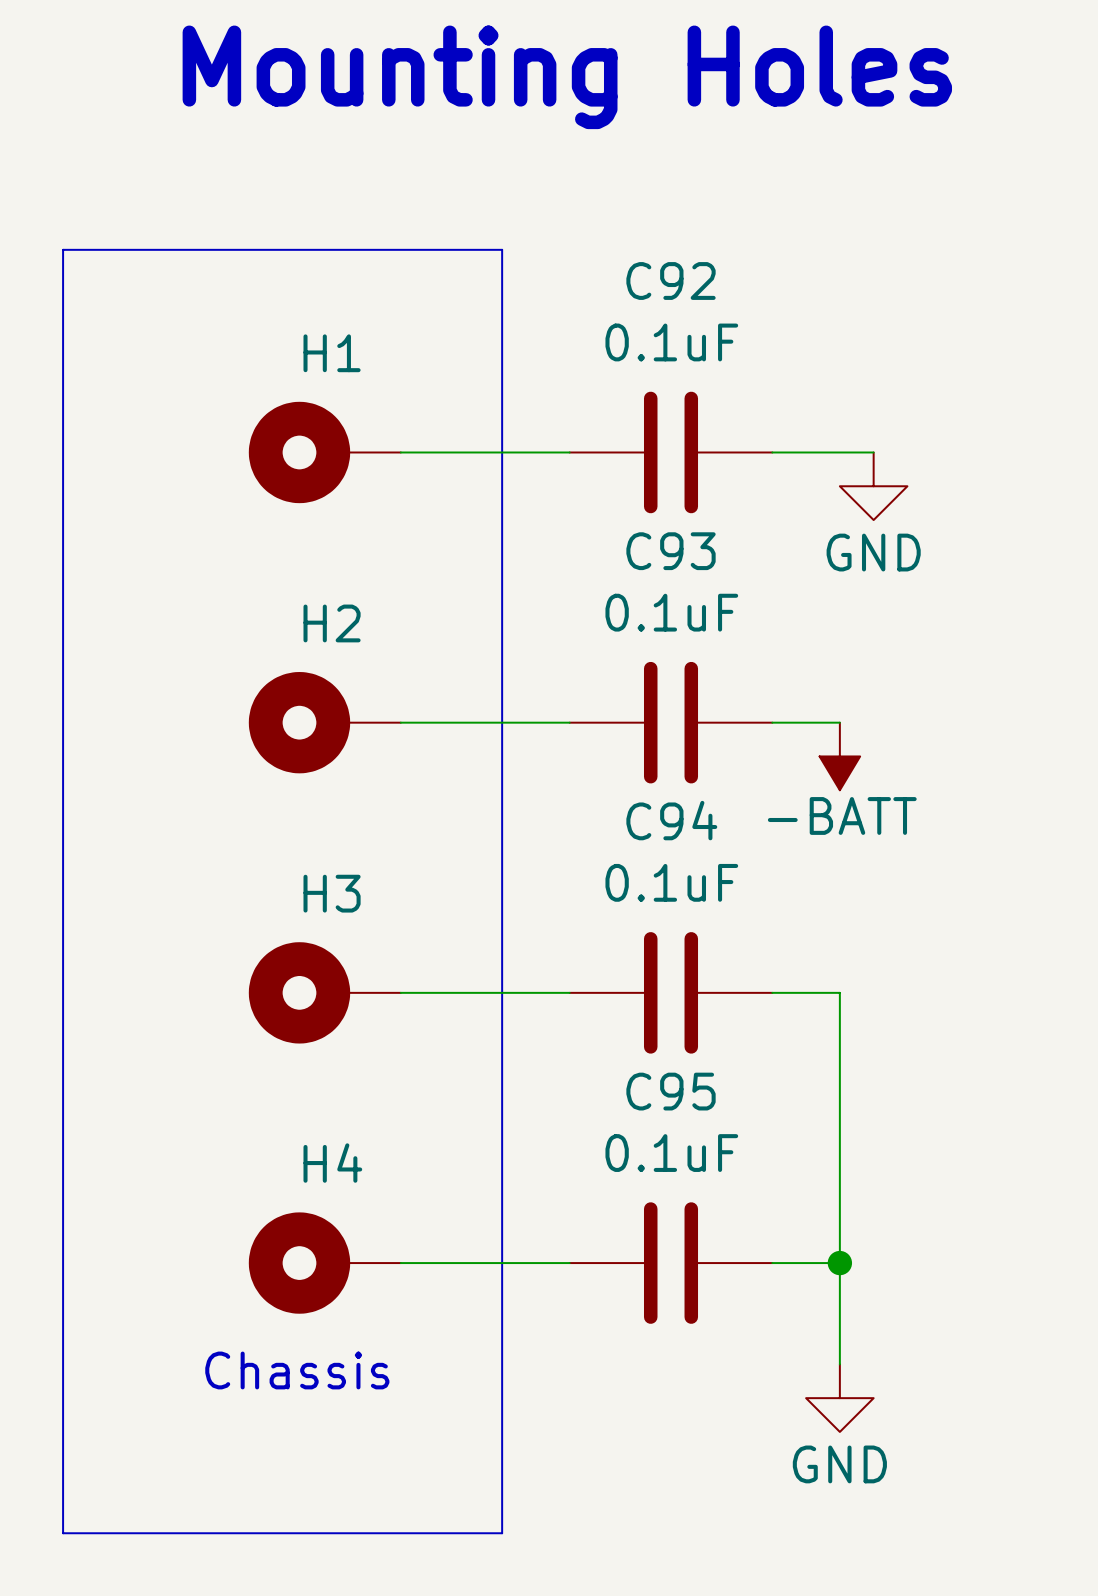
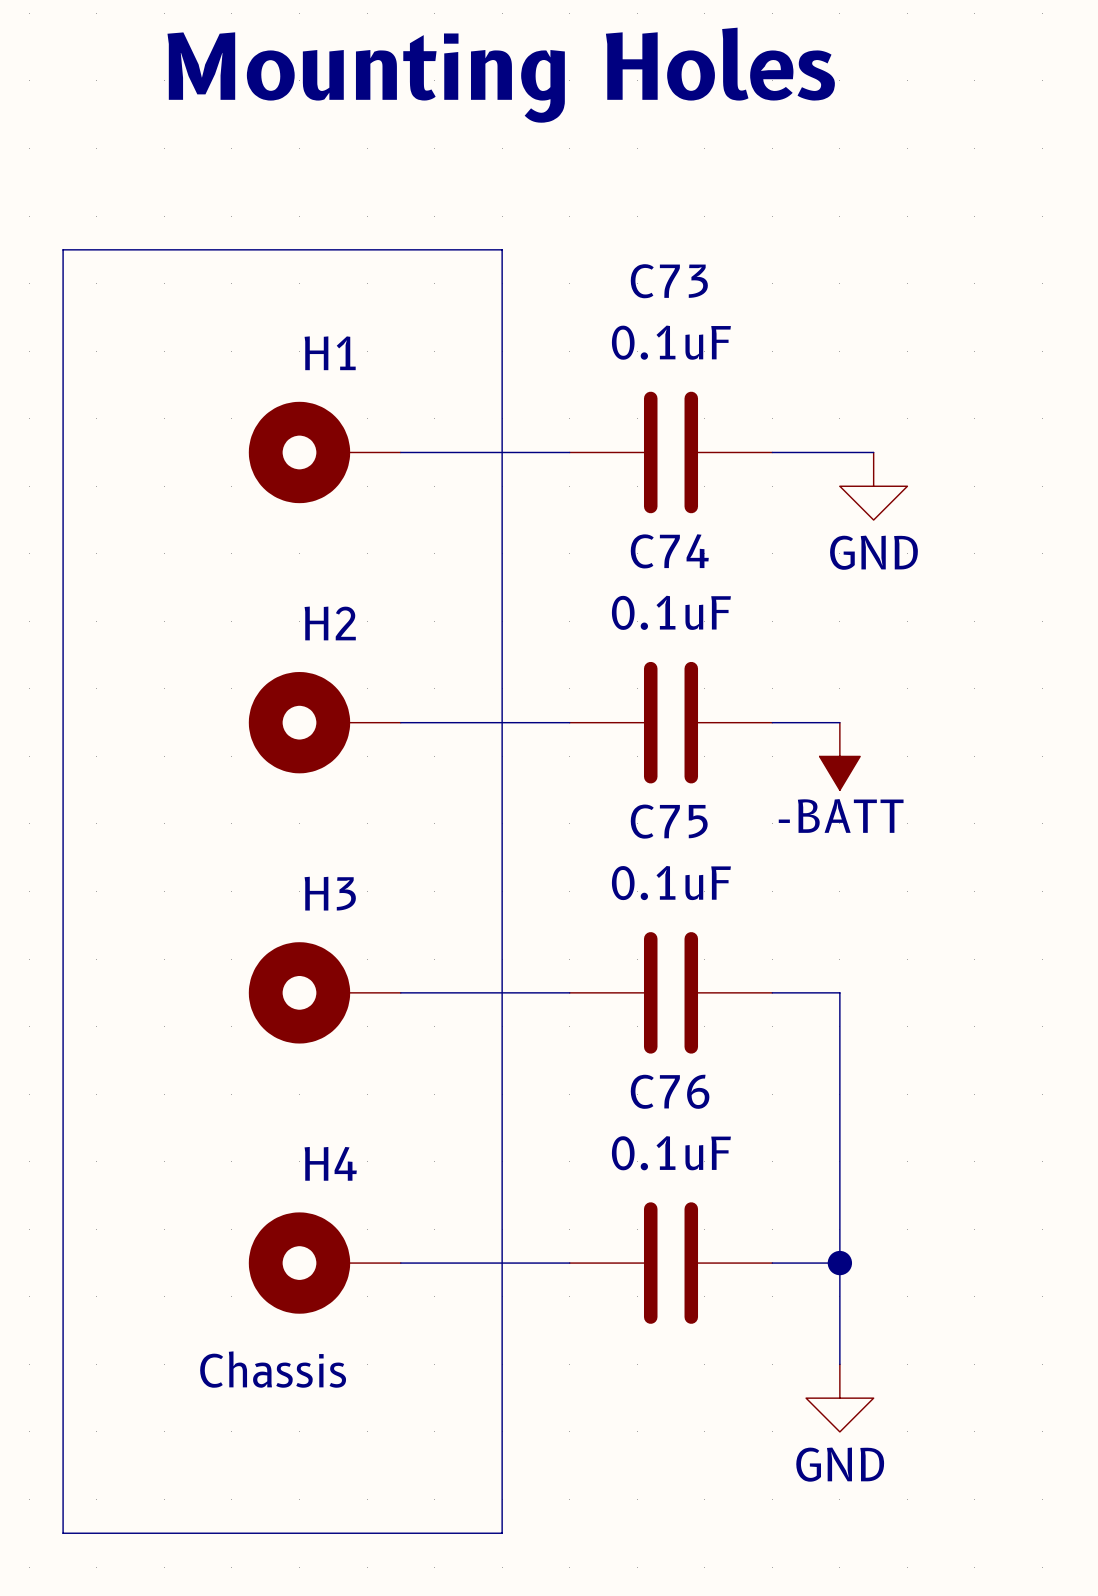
C92 name: C92 (671, 281) -> C73 (669, 281)
C93 name: C93 (671, 551) -> C74 (669, 551)
C94 name: C94 (671, 820) -> C75 (669, 821)
C95 name: C95 (671, 1091) -> C76 (670, 1091)

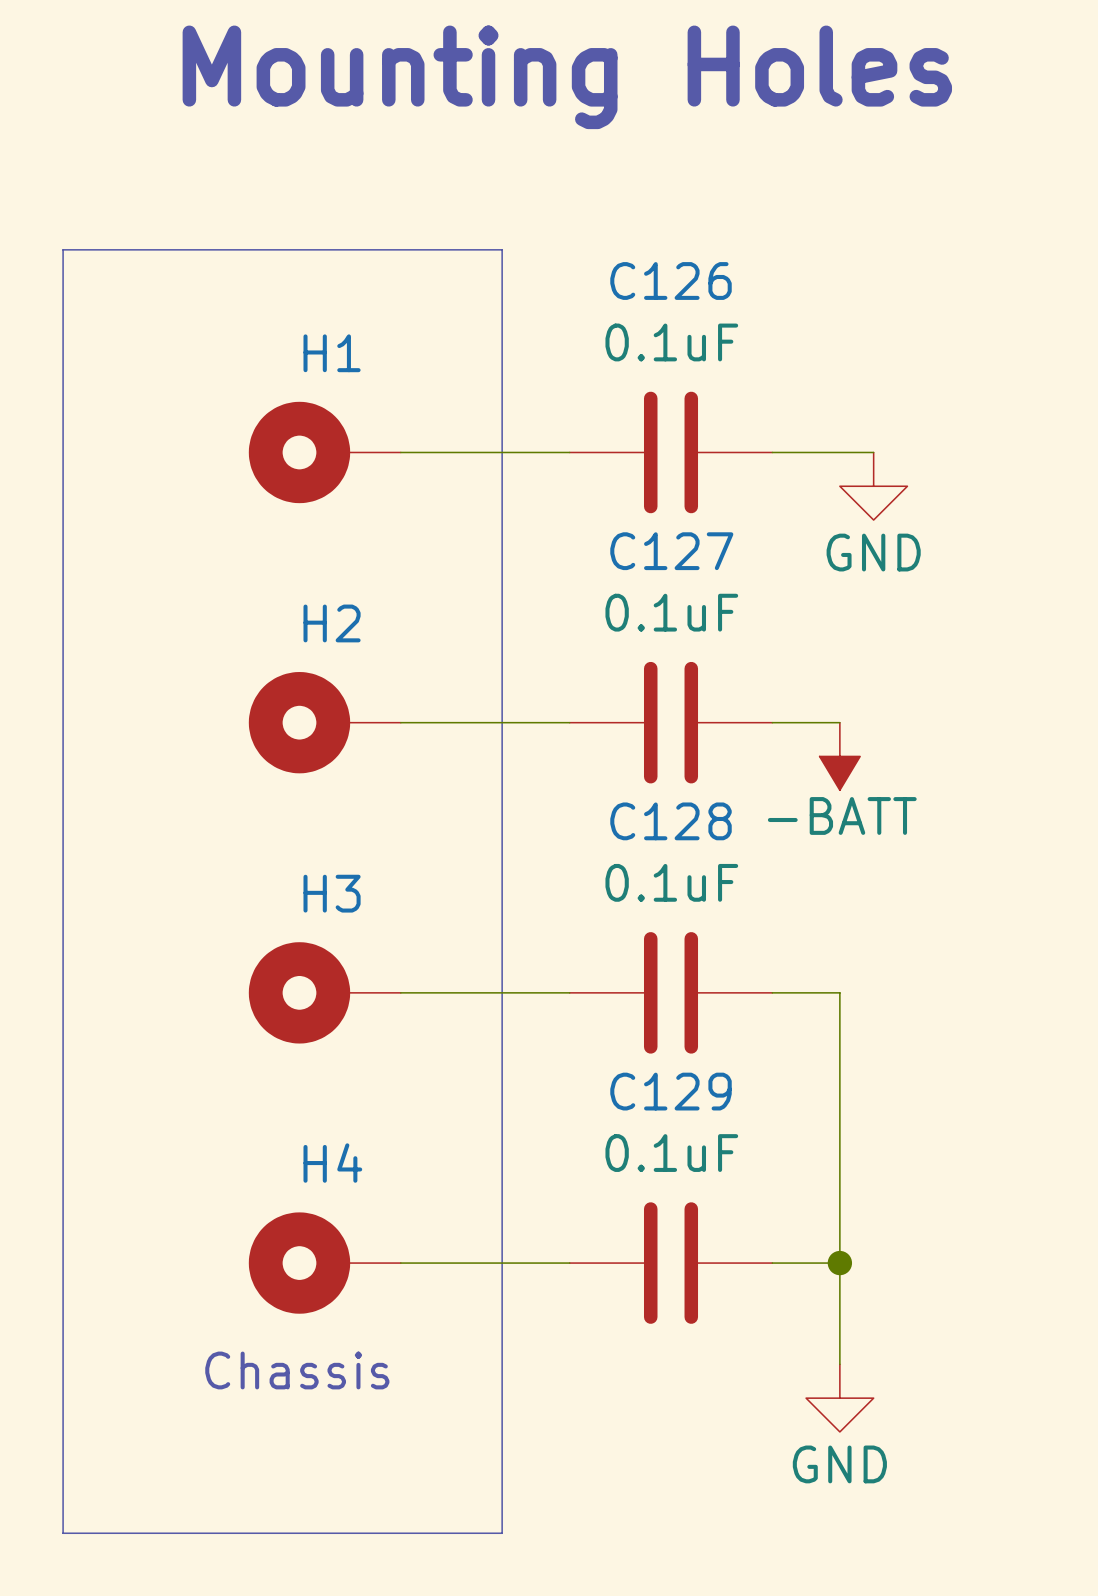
C73 name: C73 (669, 281) -> C126 (671, 281)
C74 name: C74 (669, 551) -> C127 (671, 551)
C75 name: C75 (669, 821) -> C128 (671, 821)
C76 name: C76 (670, 1091) -> C129 (671, 1091)

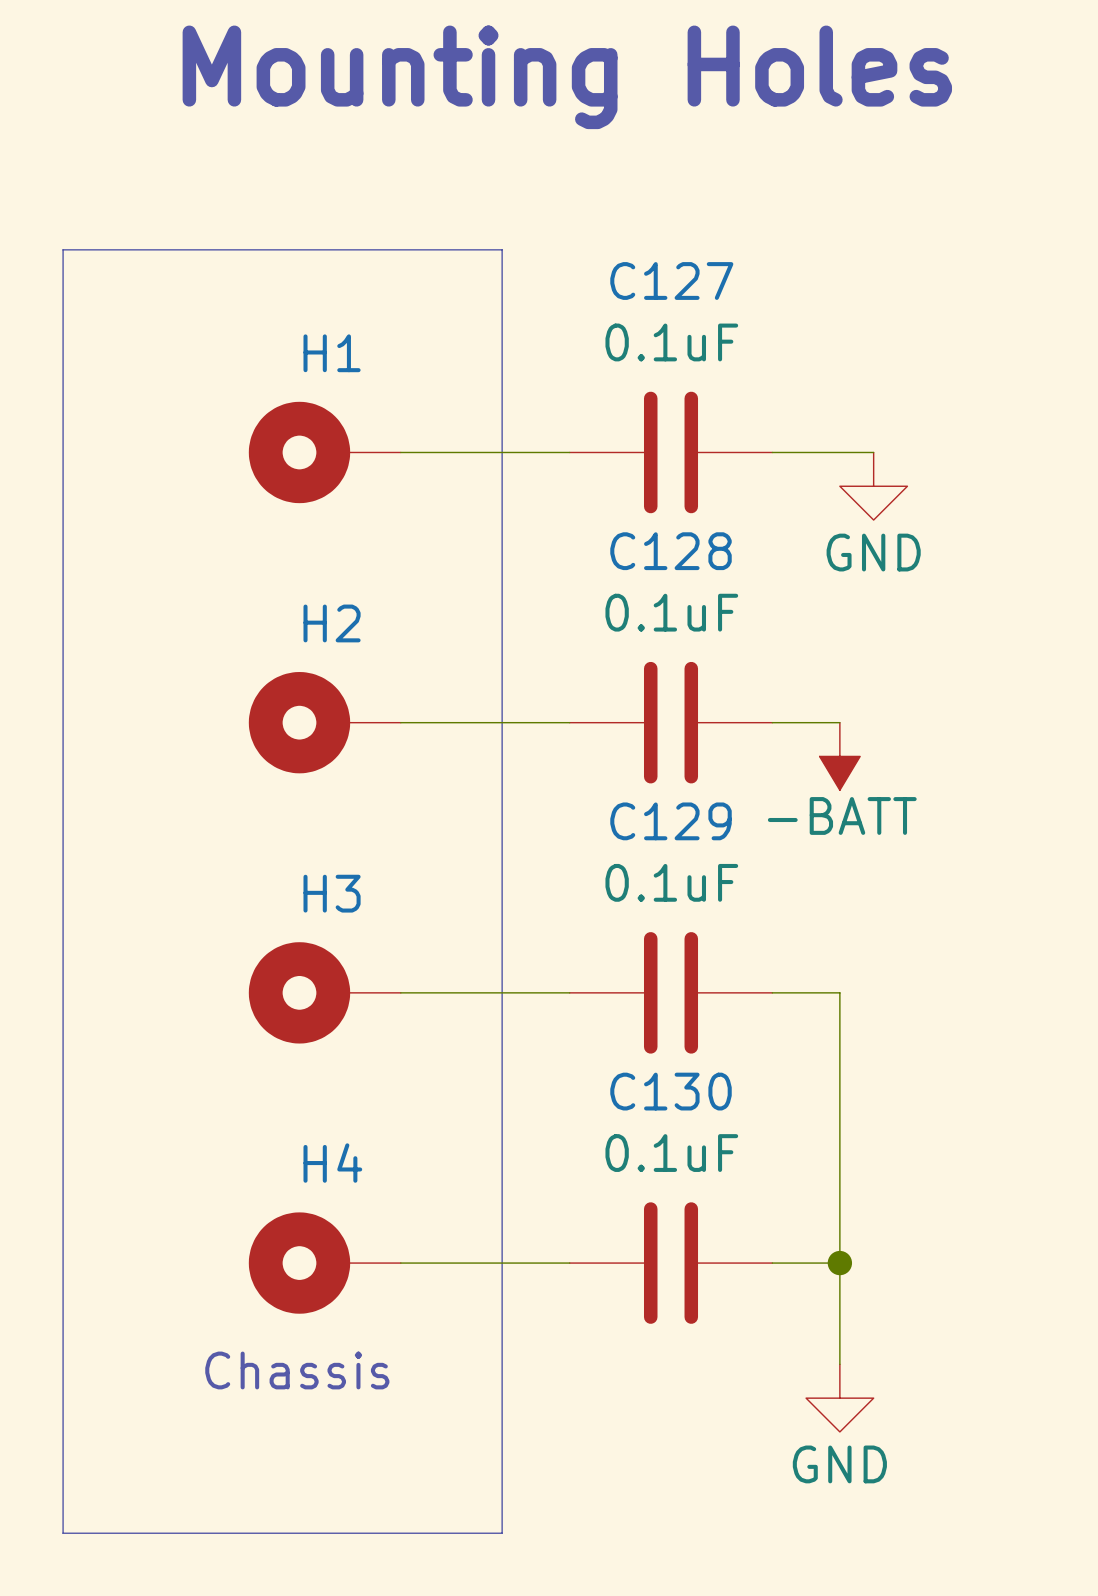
C126 name: C126 (671, 281) -> C127 (671, 281)
C127 name: C127 (671, 551) -> C128 (671, 551)
C128 name: C128 (671, 821) -> C129 (671, 821)
C129 name: C129 (671, 1091) -> C130 (671, 1091)

